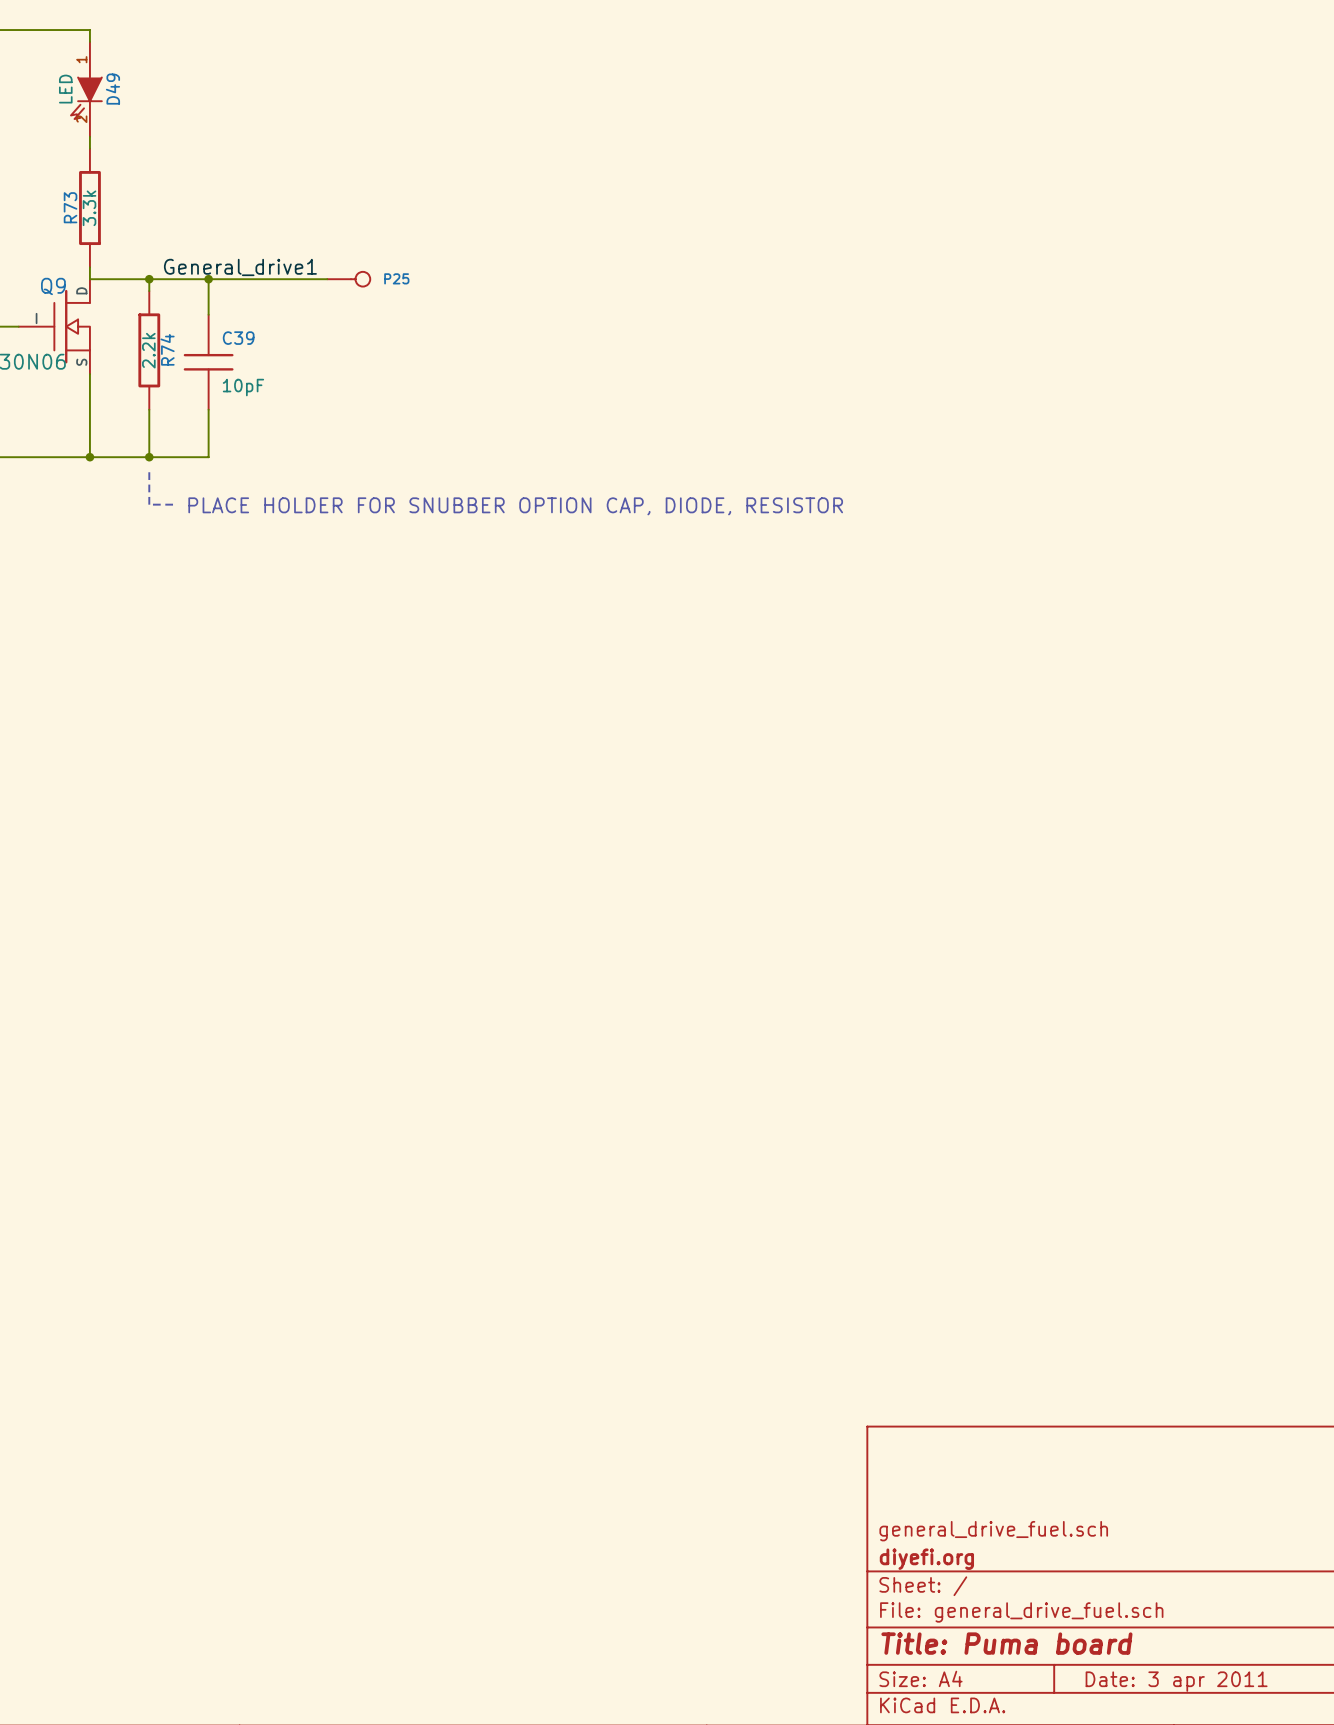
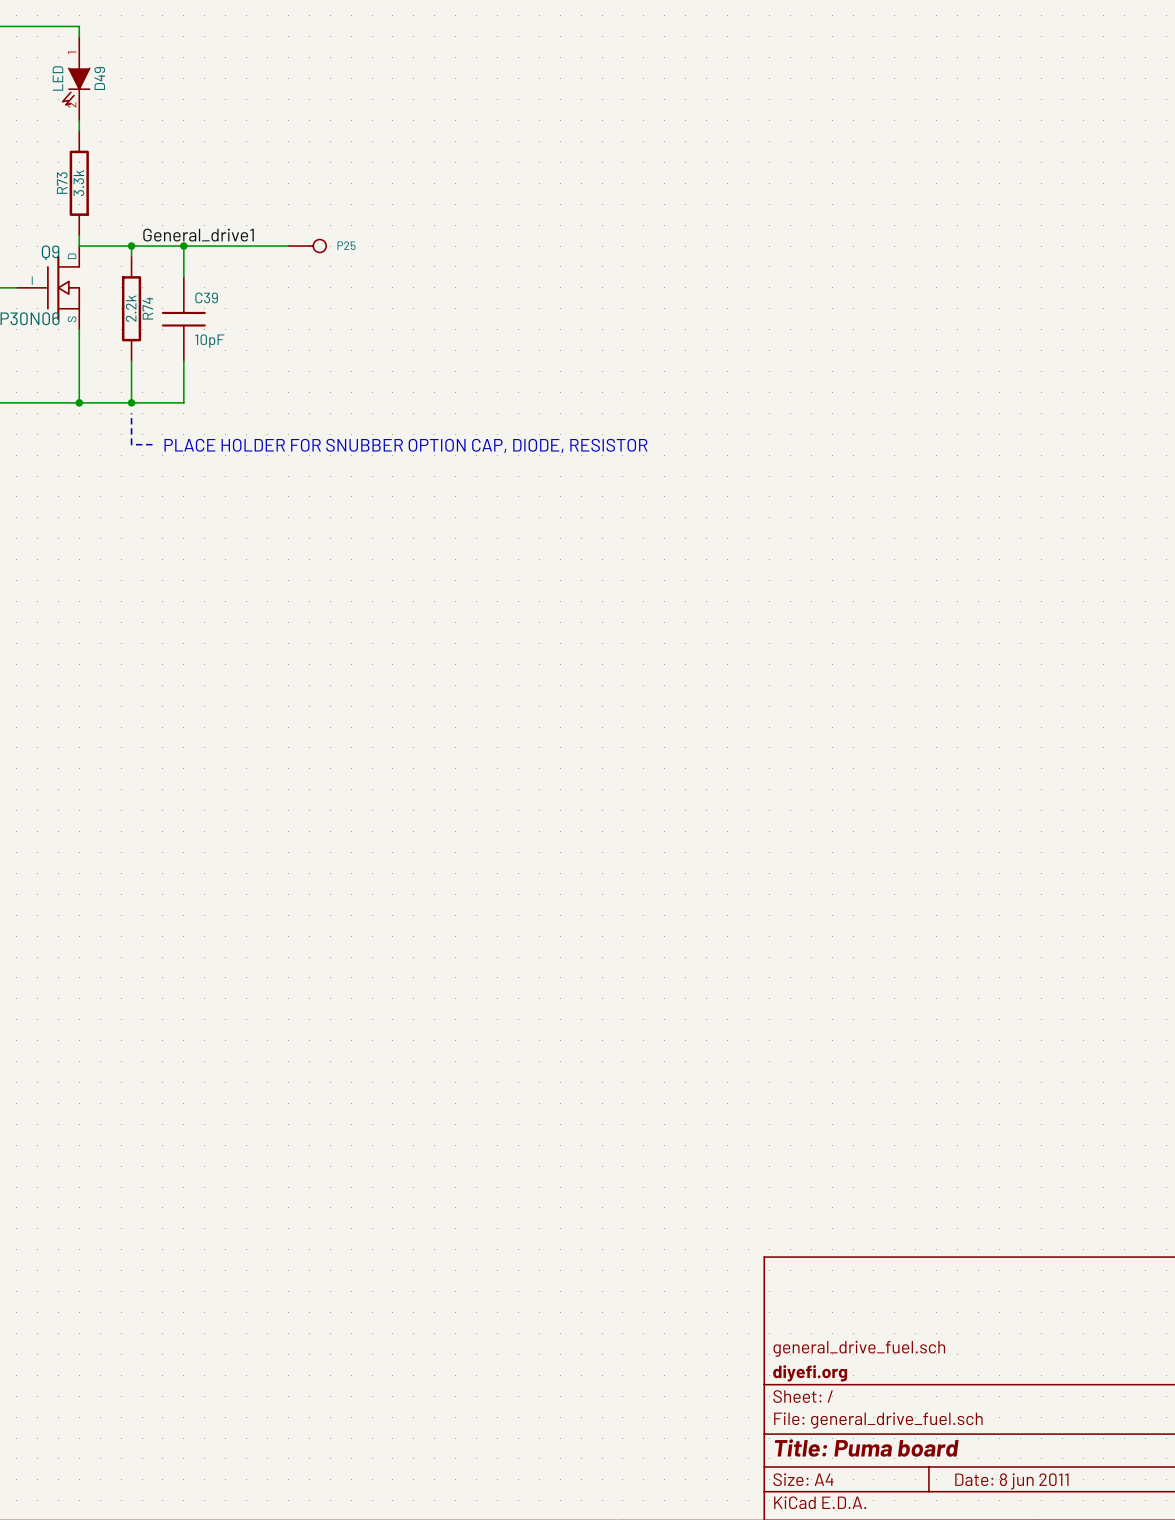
title block: Date: 3 apr 2011 (1176, 1681) -> Date: 8 jun 2011 (1011, 1481)

